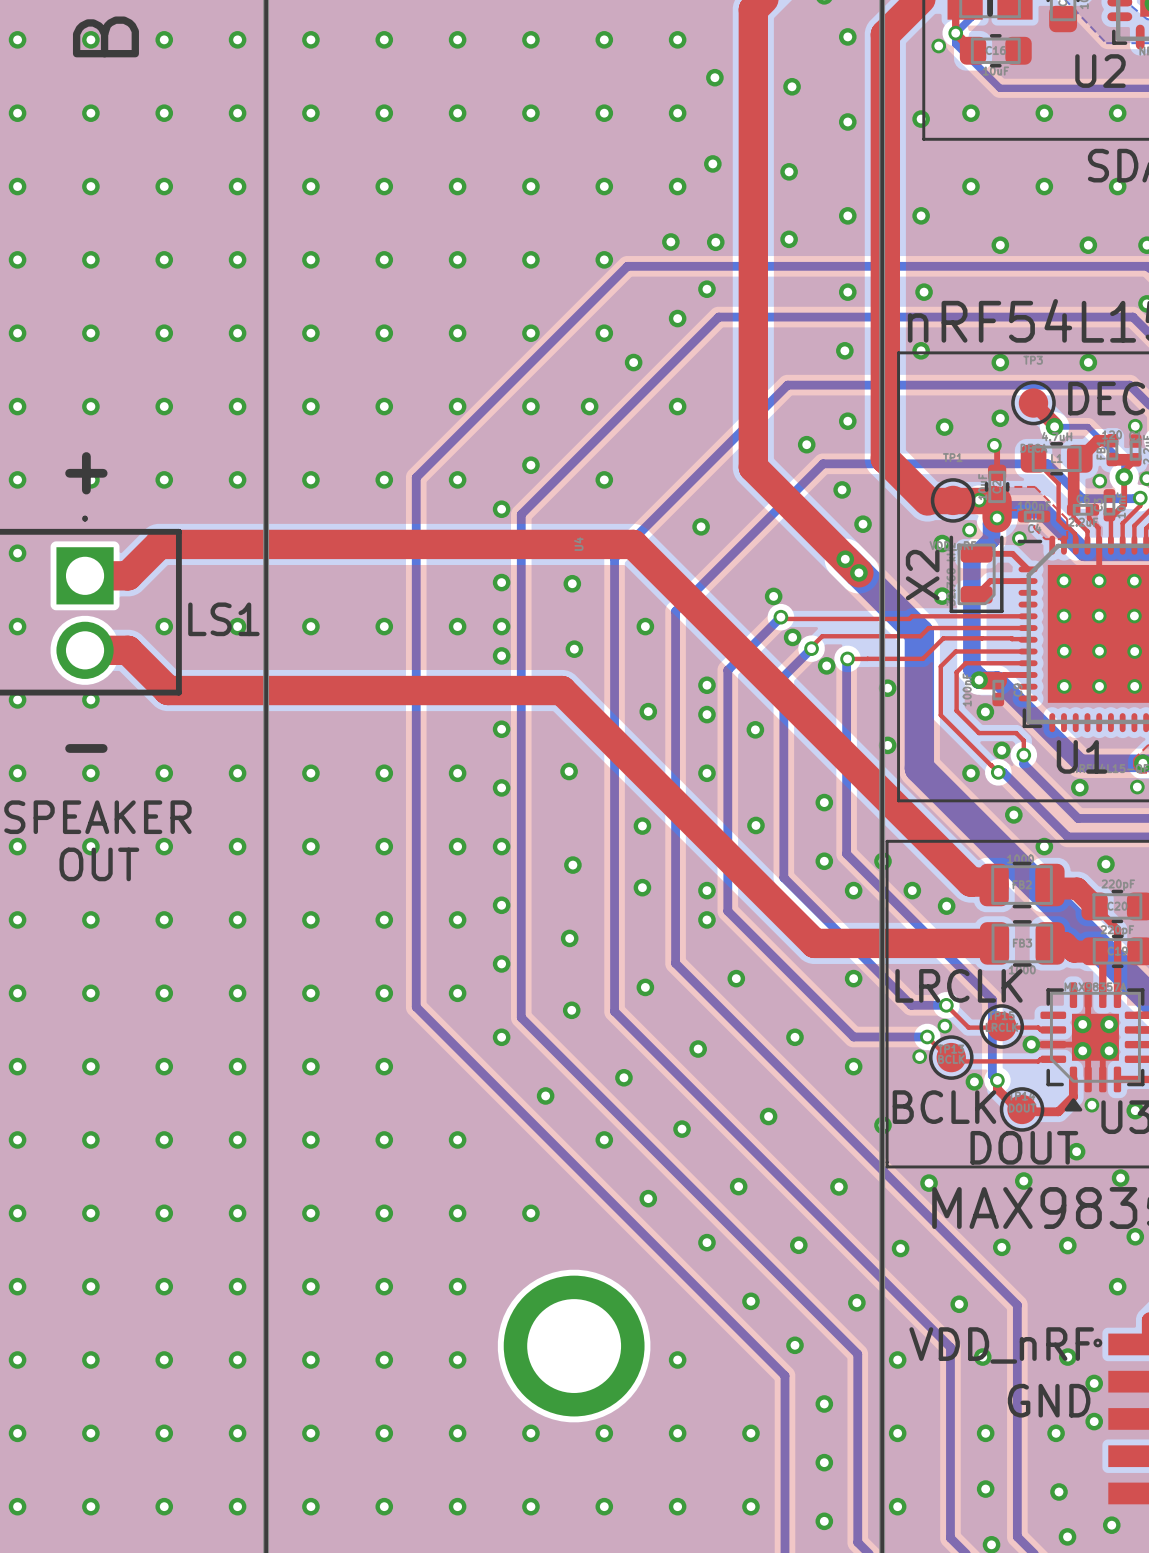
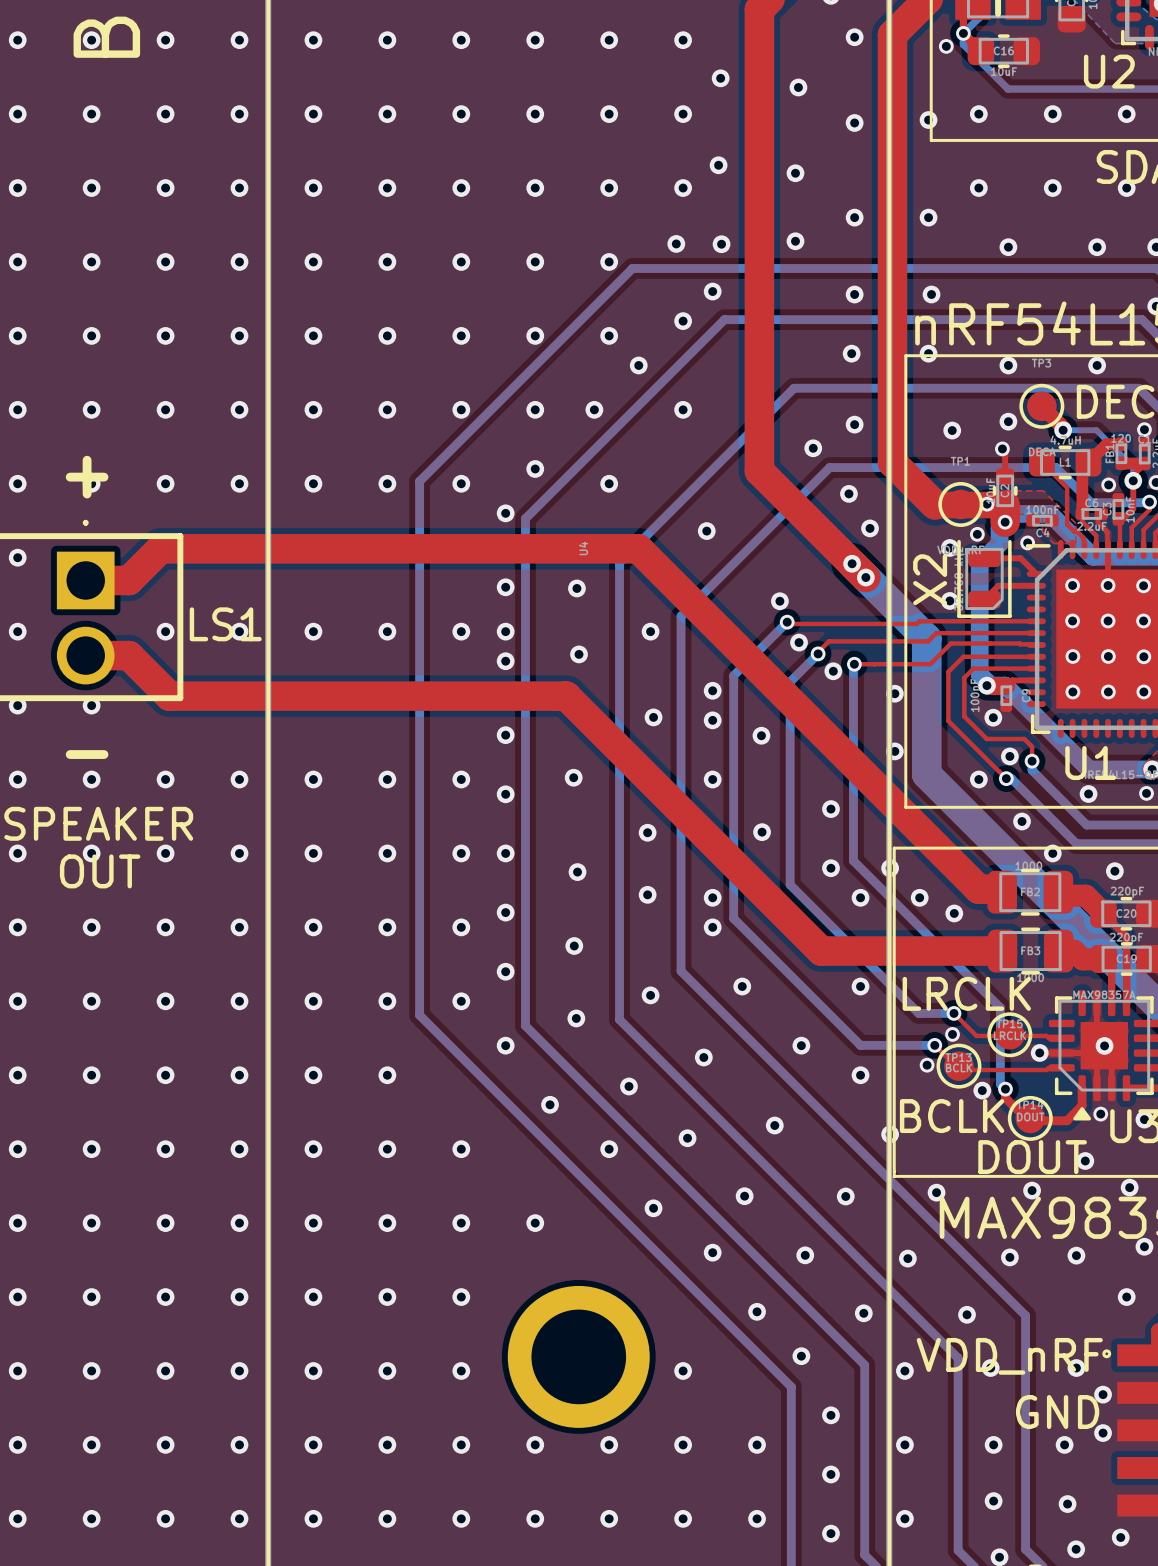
via: (1082, 1024) -> none
via: (1109, 1024) -> none
via: none -> (1104, 1045)
via: (1082, 1050) -> none
via: (1109, 1050) -> none

